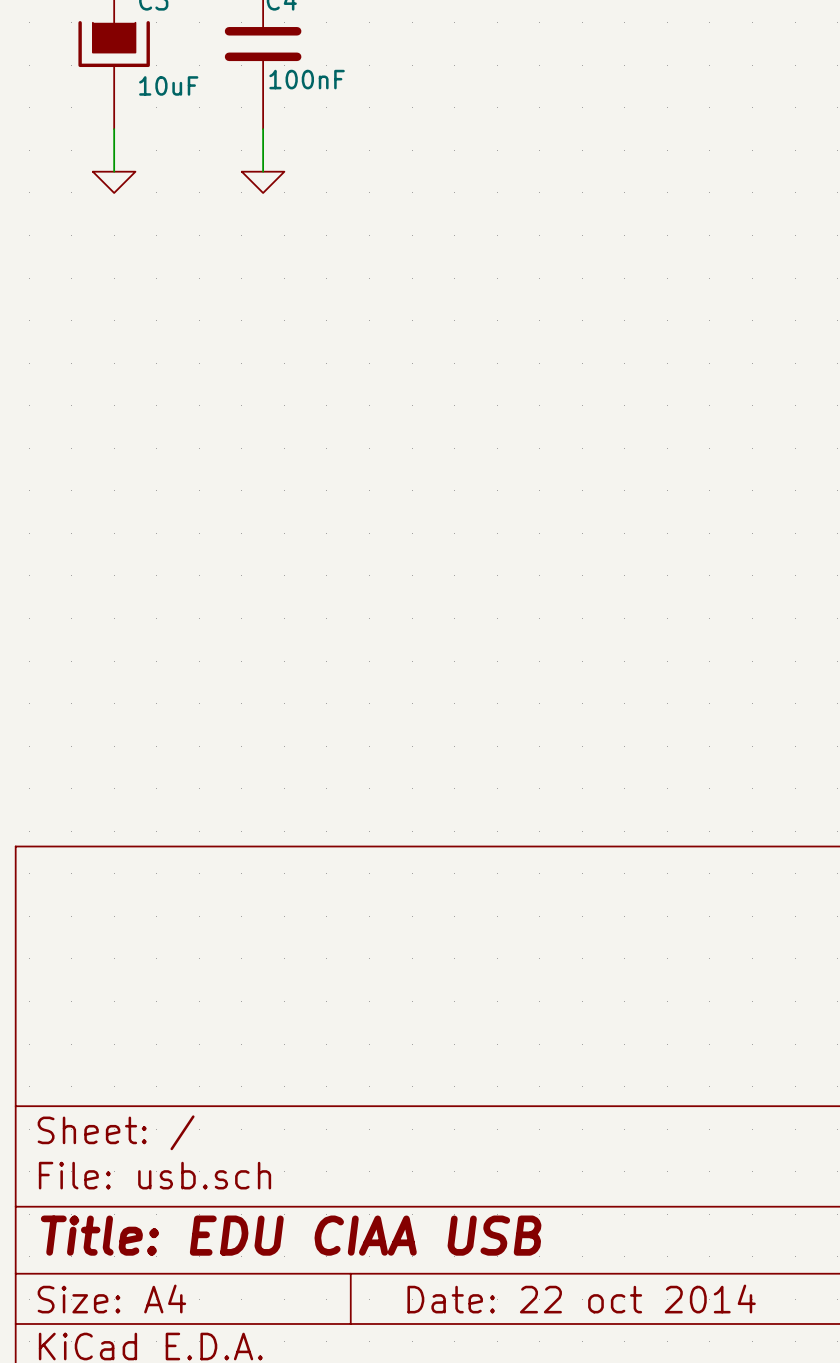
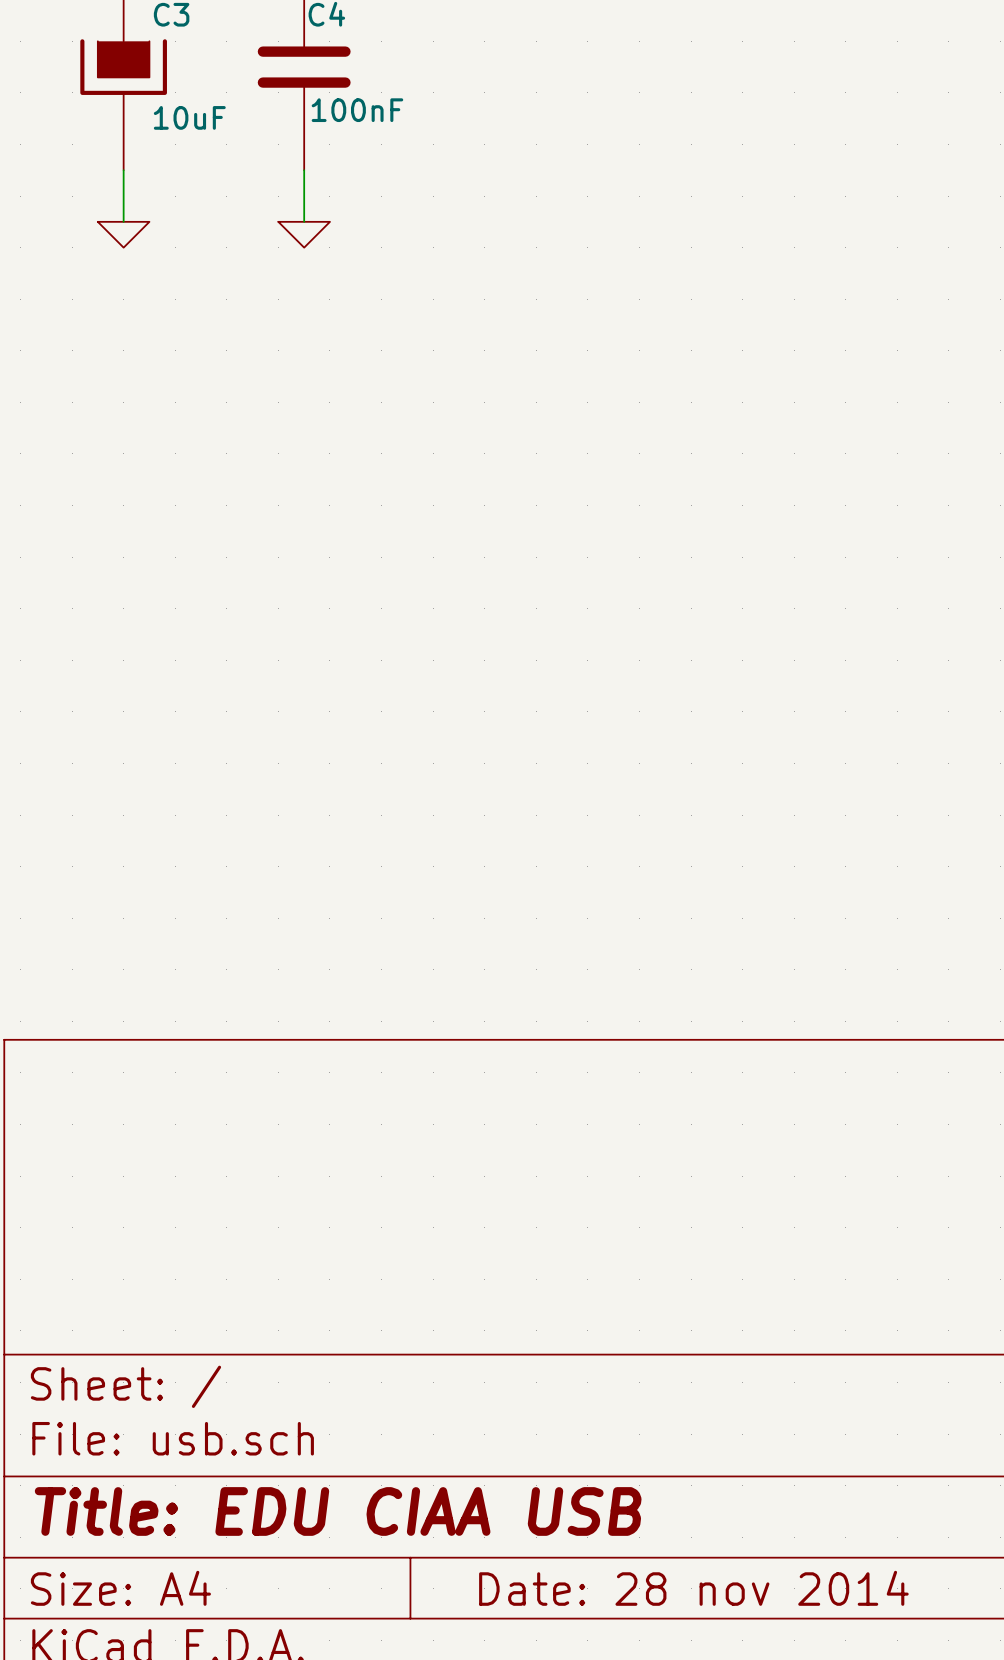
title block: Date: 22 oct 2014 (581, 1299) -> Date: 28 nov 2014 (693, 1588)

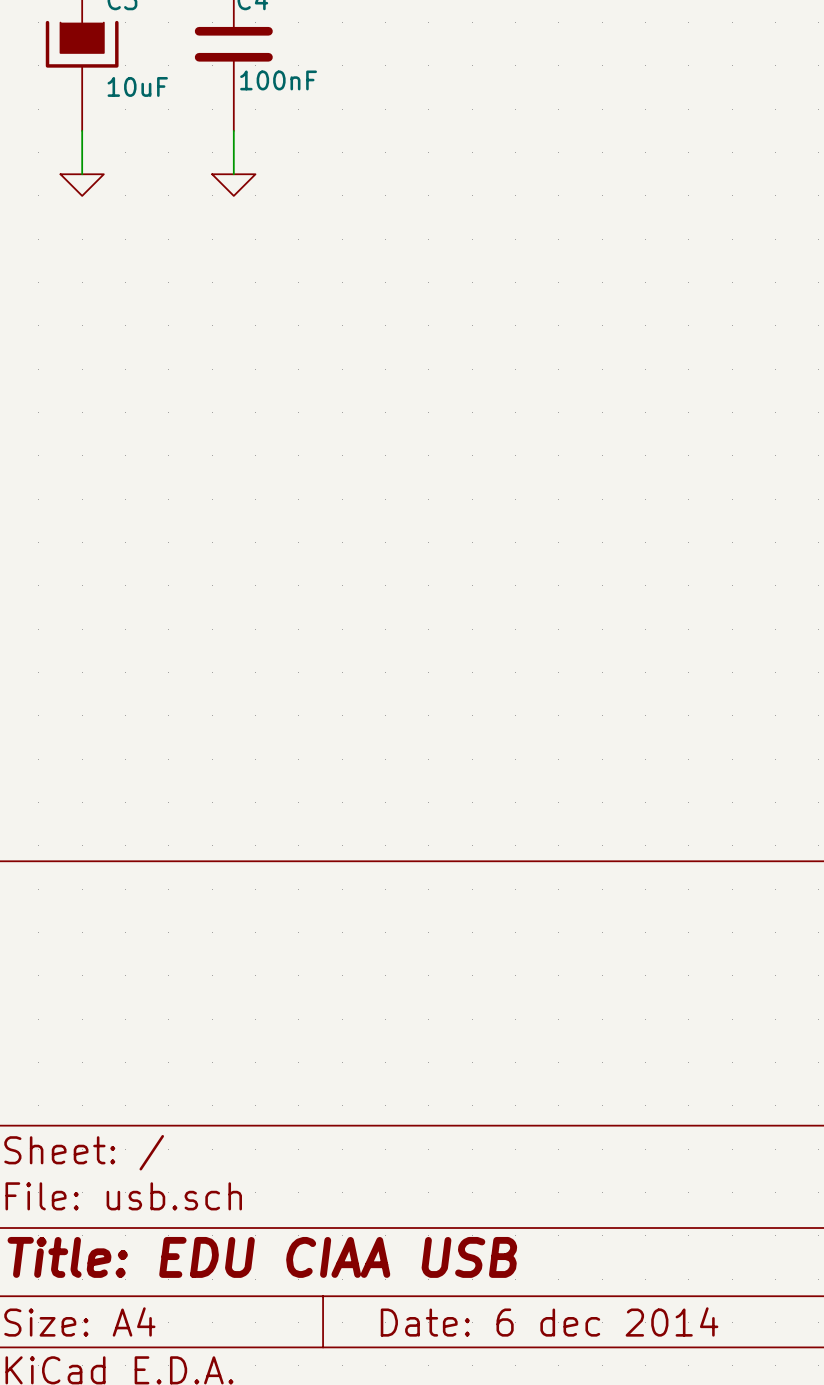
title block: Date: 28 nov 2014 (693, 1588) -> Date: 6 dec 2014 (549, 1321)

